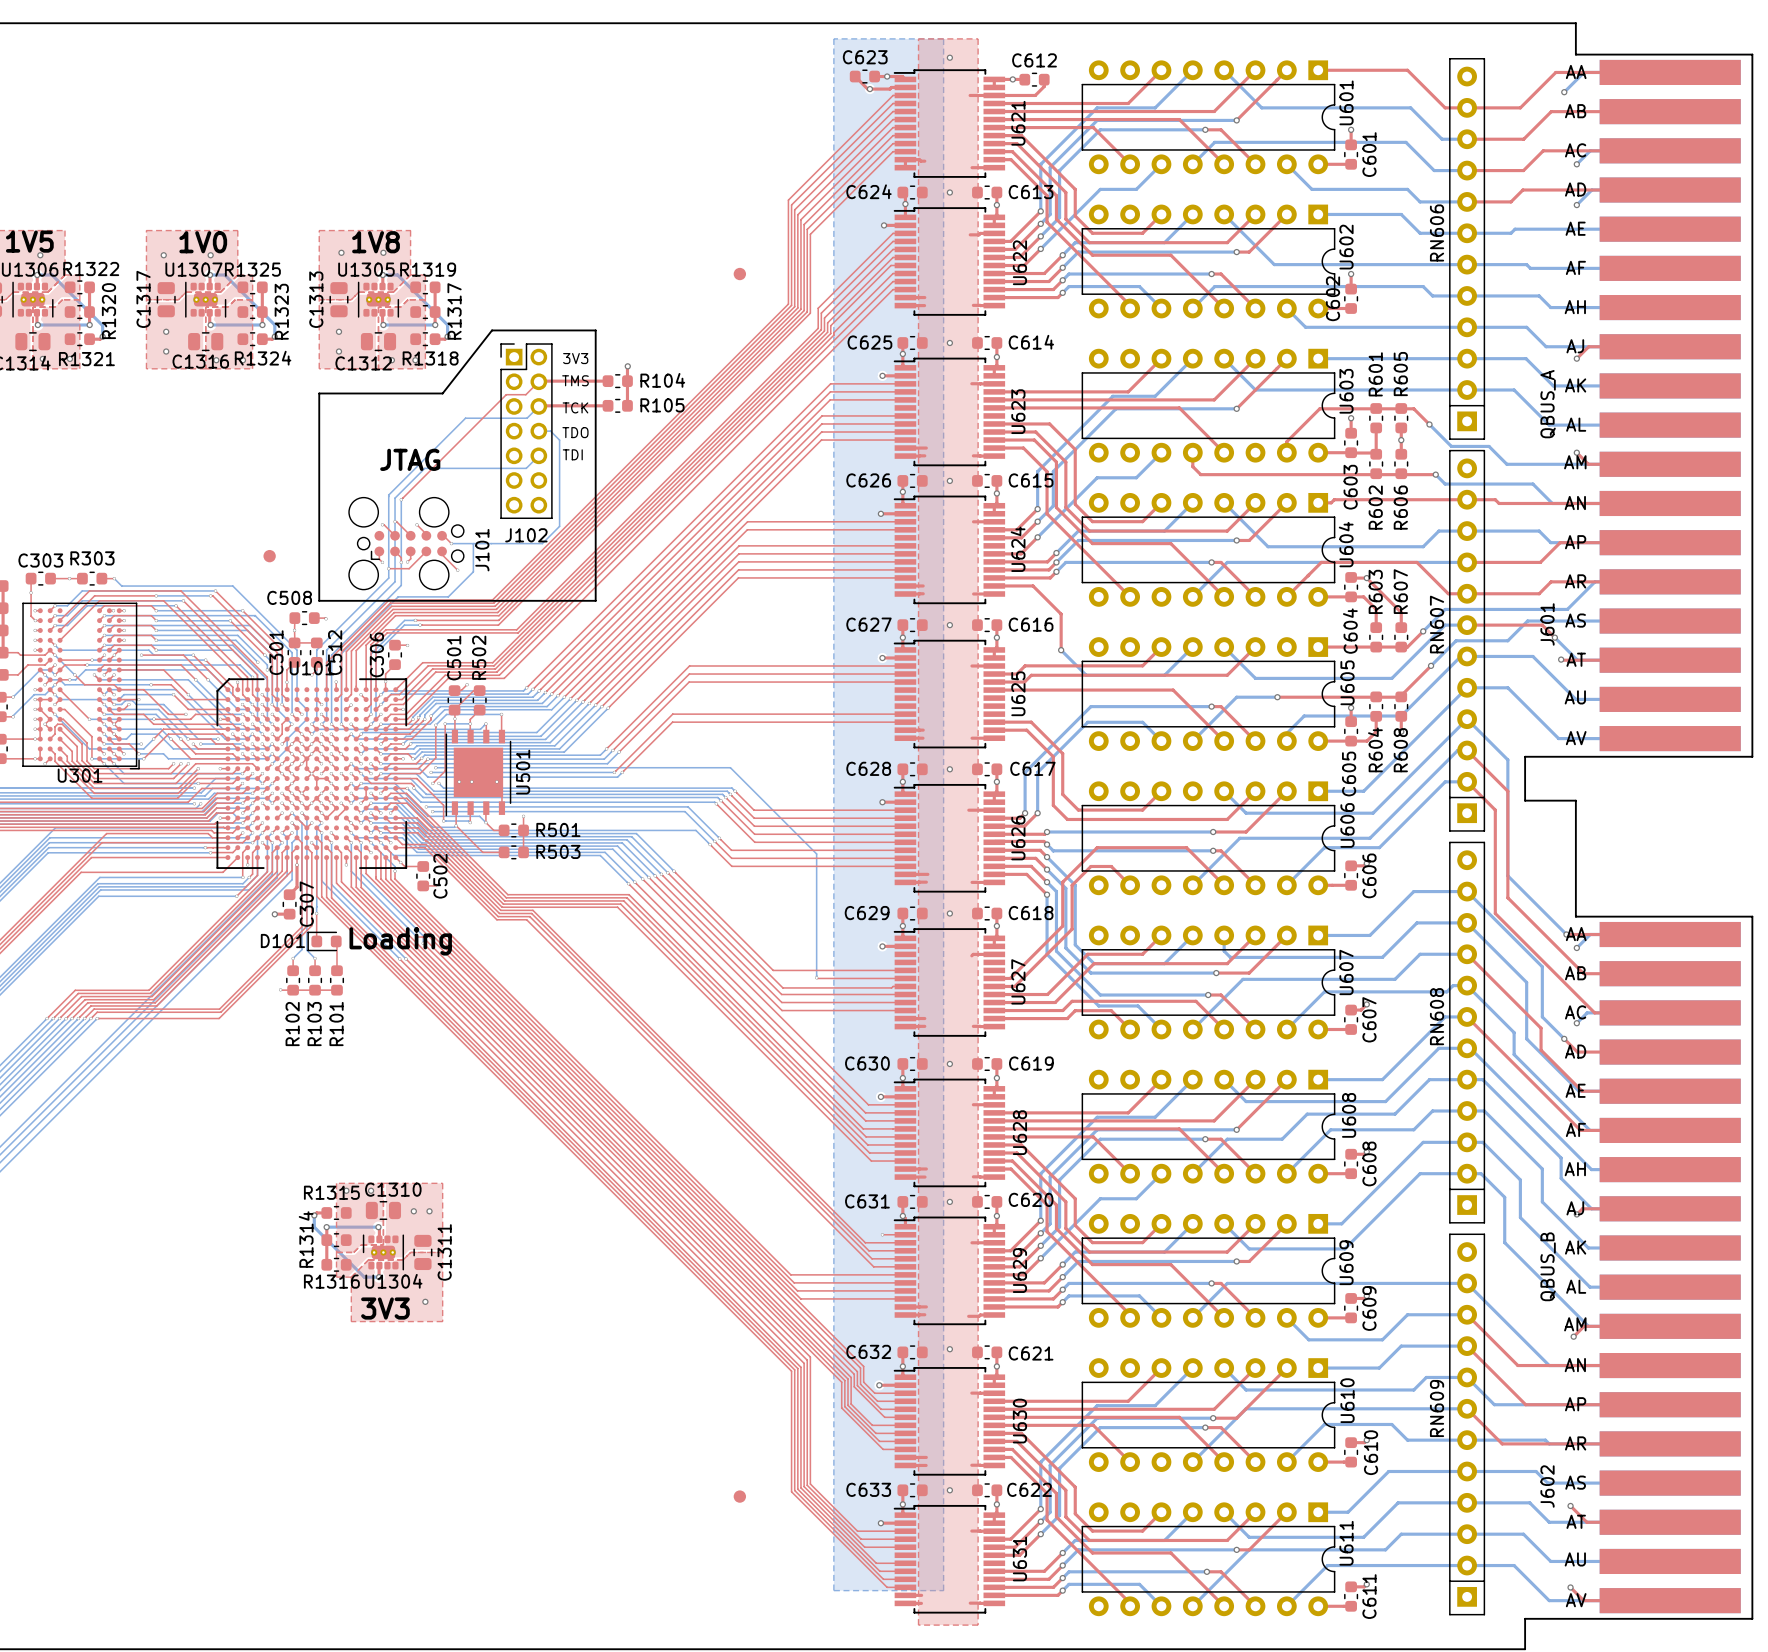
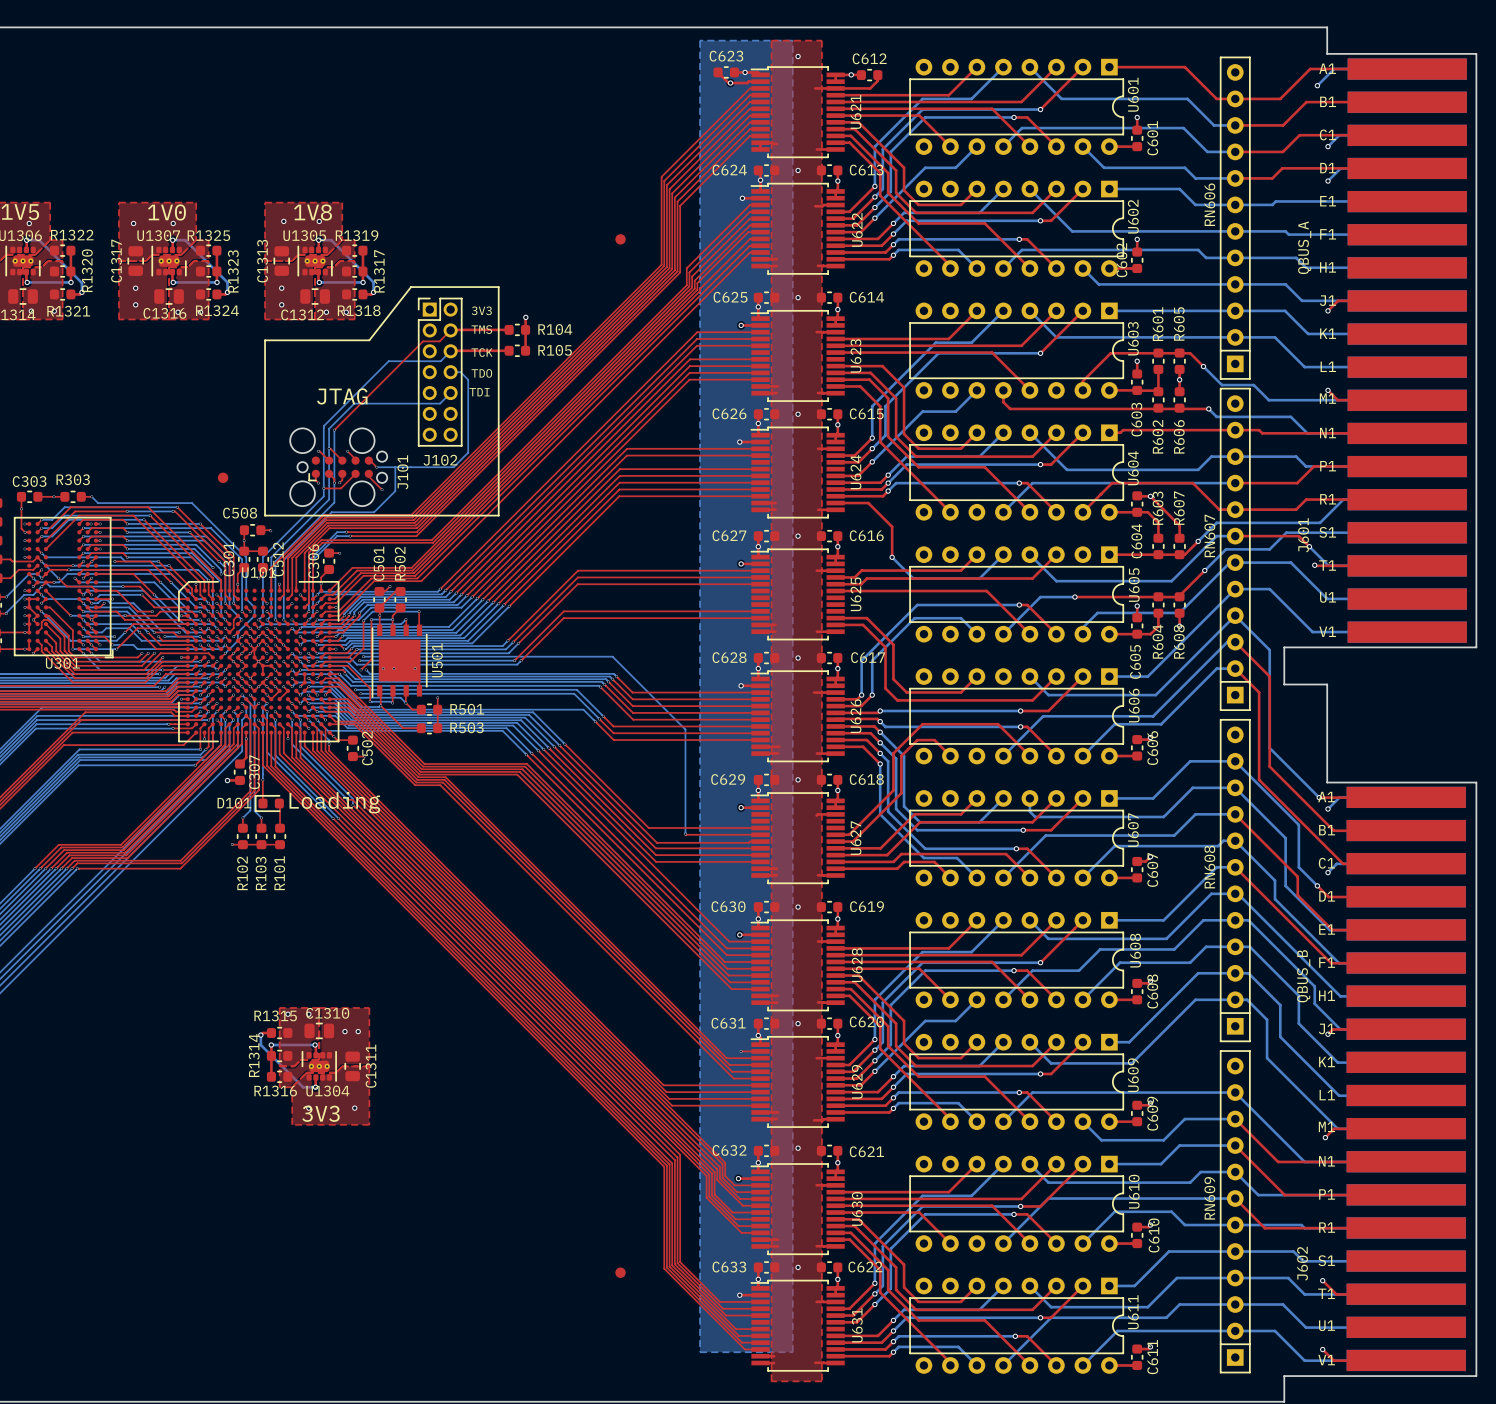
J601 footprint: [1599, 59, 1741, 752] -> [1347, 58, 1467, 643]
J601 value position: QBUS_A (1548, 404) -> QBUS_A (1304, 247)
J602 footprint: [1599, 921, 1741, 1614] -> [1346, 786, 1466, 1372]
J602 value position: QBUS_B (1548, 1266) -> QBUS_B (1303, 976)

